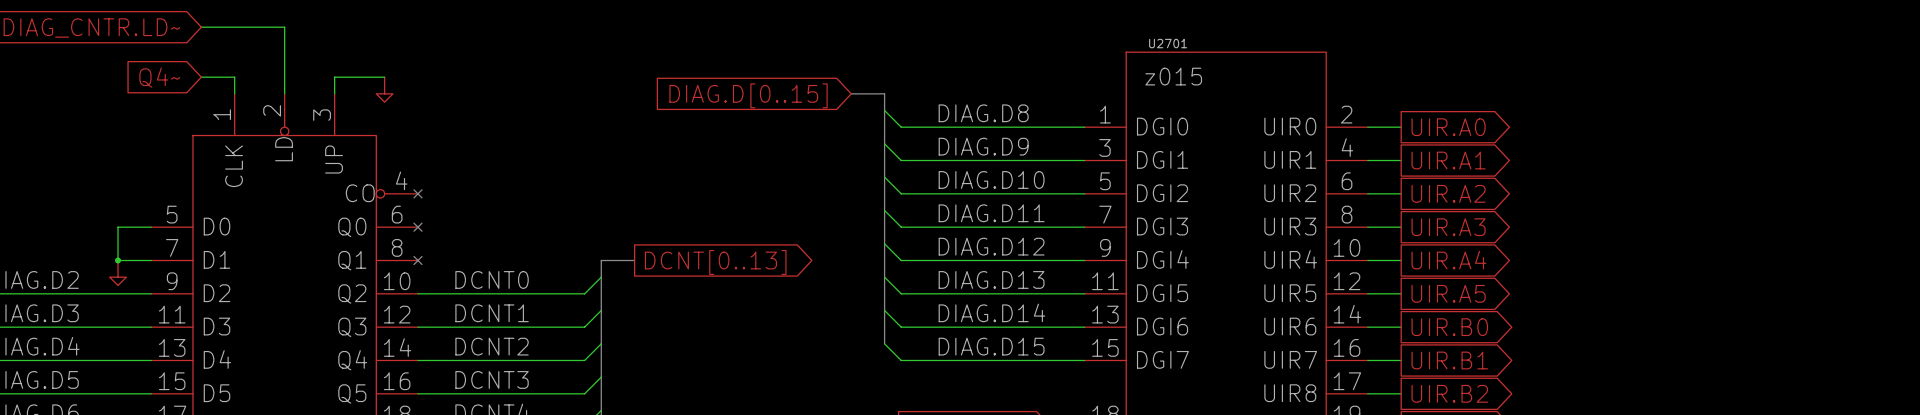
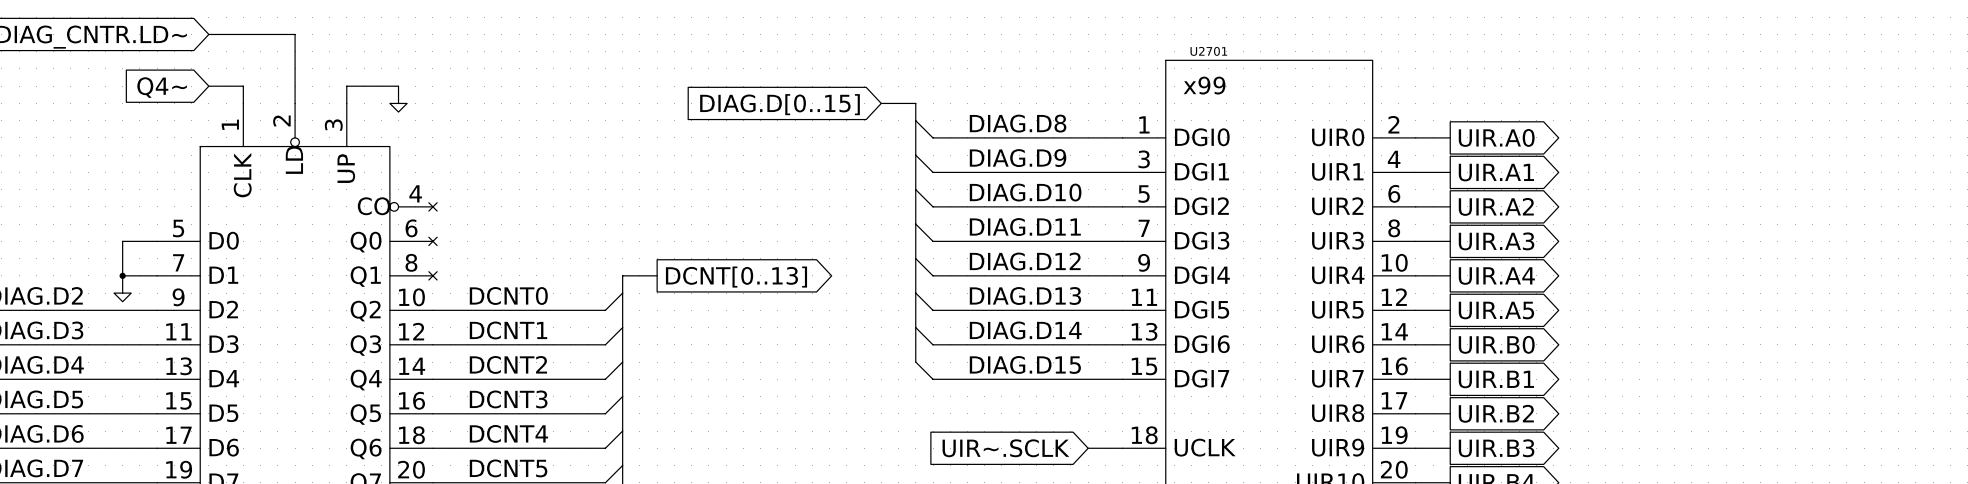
U2701 text: z015 (1173, 76) -> x99 (1204, 85)

